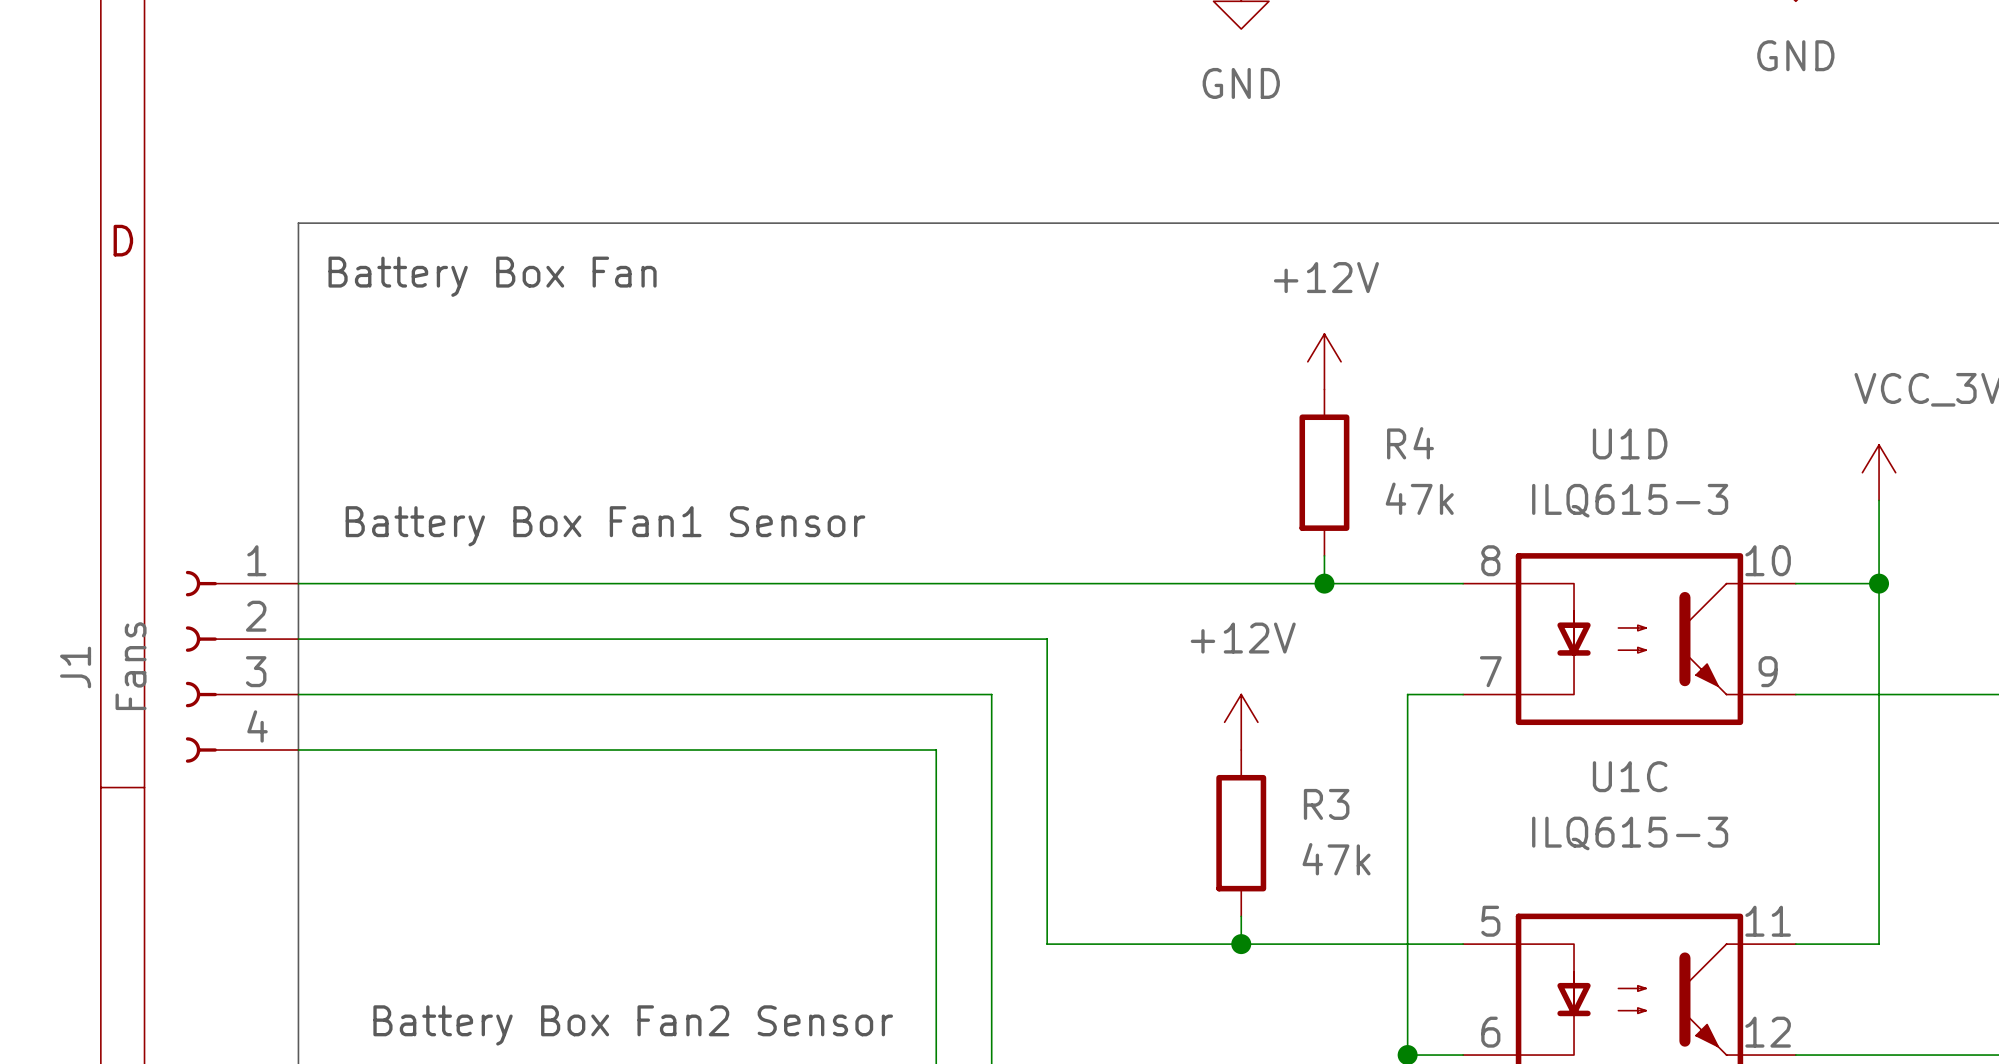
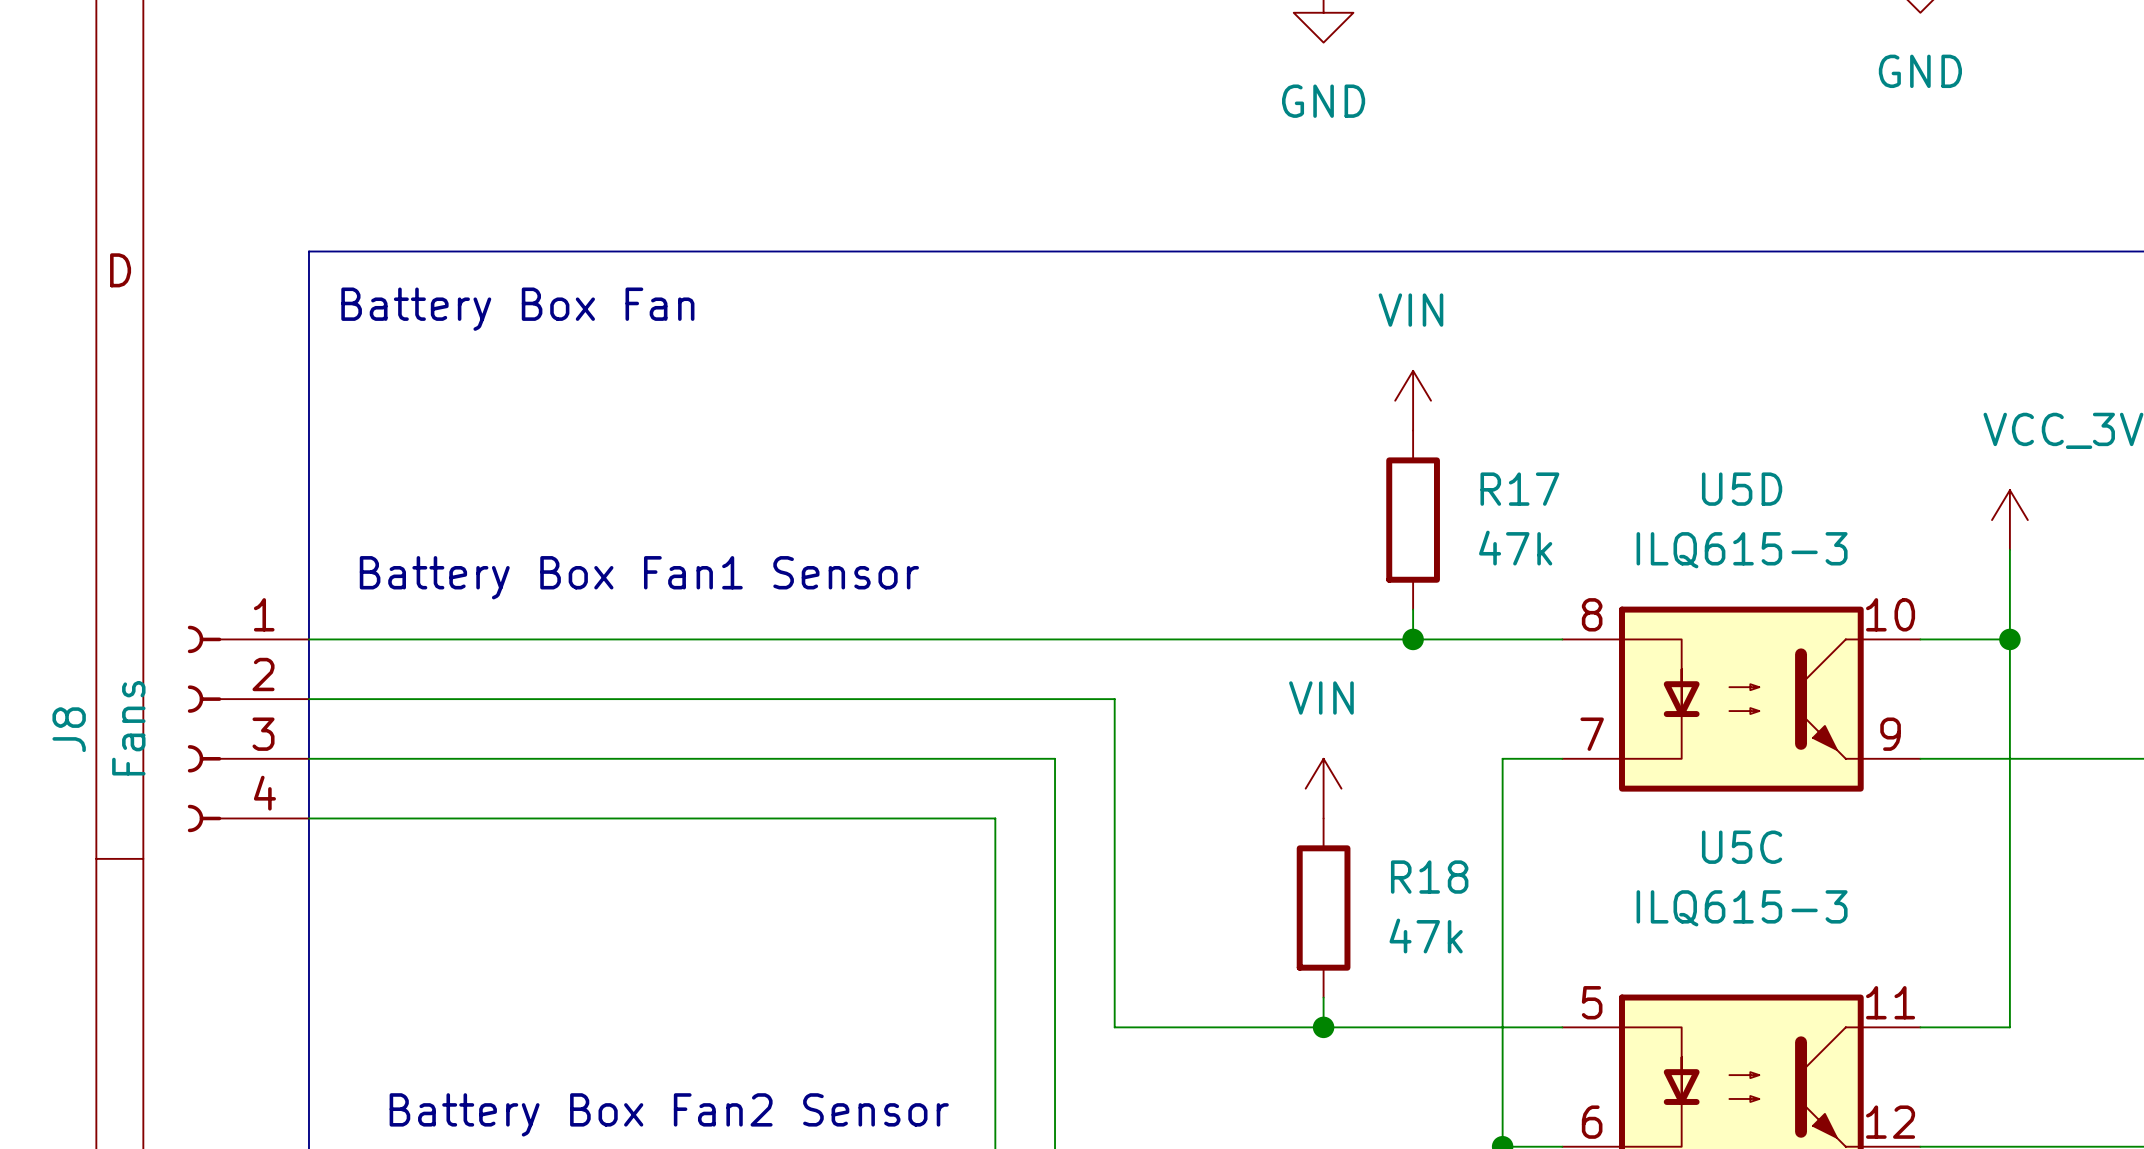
power symbol: +12V (1324, 361) -> VIN (1413, 400)
R4 name: R4 (1410, 443) -> R17 (1519, 489)
U1D name: U1D (1630, 443) -> U5D (1742, 489)
J1 name: J1 (75, 667) -> J8 (69, 729)
power symbol: +12V (1241, 722) -> VIN (1323, 788)
U1C name: U1C (1630, 776) -> U5C (1742, 847)
R3 name: R3 (1326, 804) -> R18 (1429, 877)

